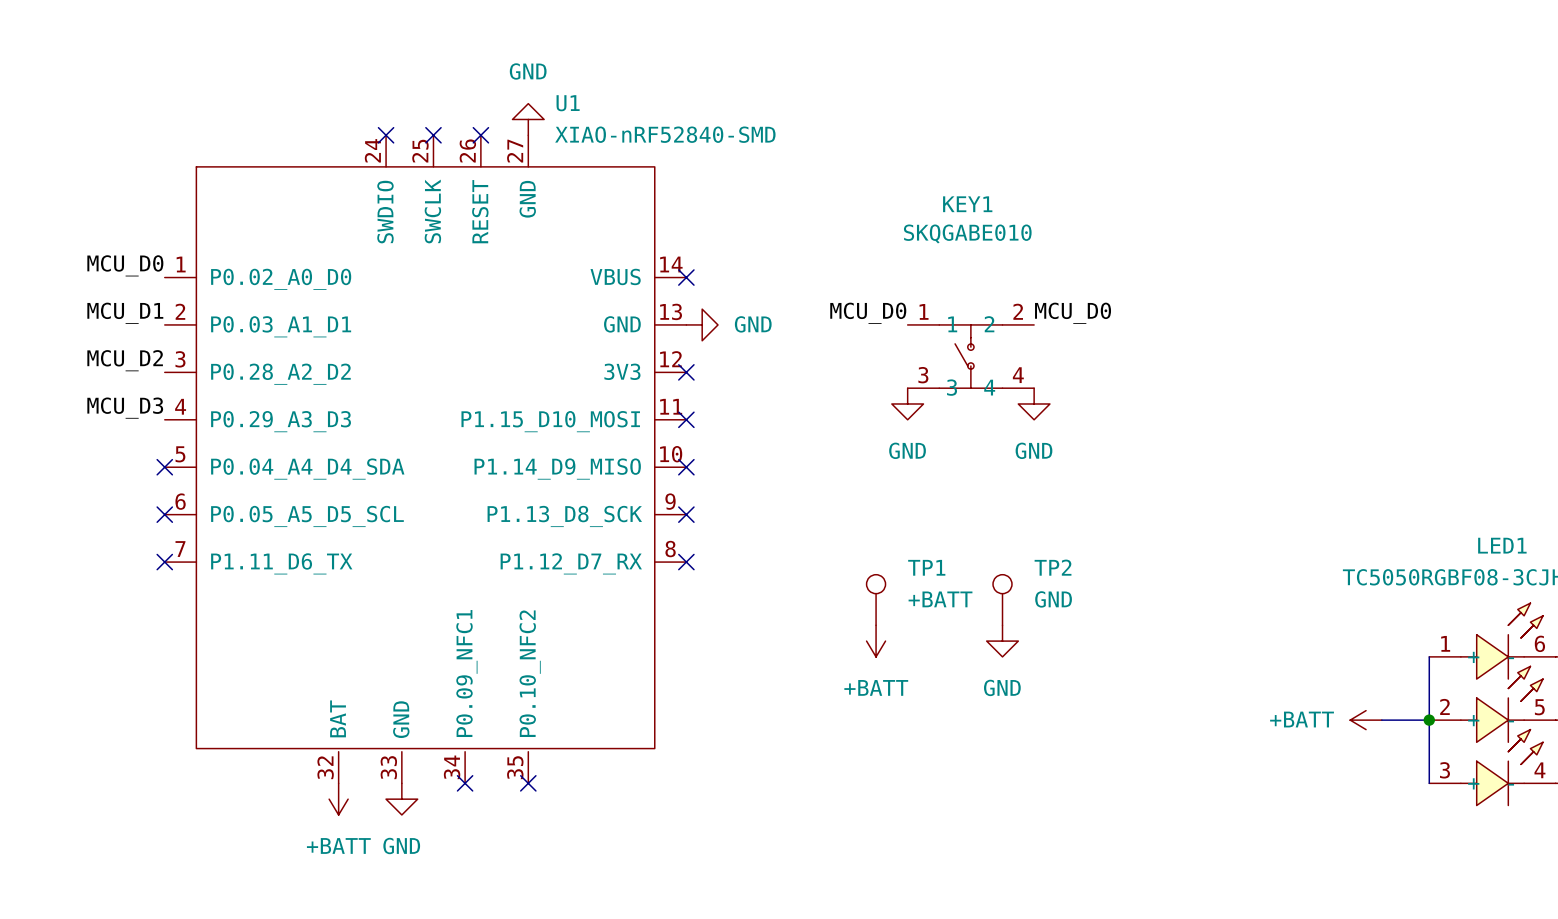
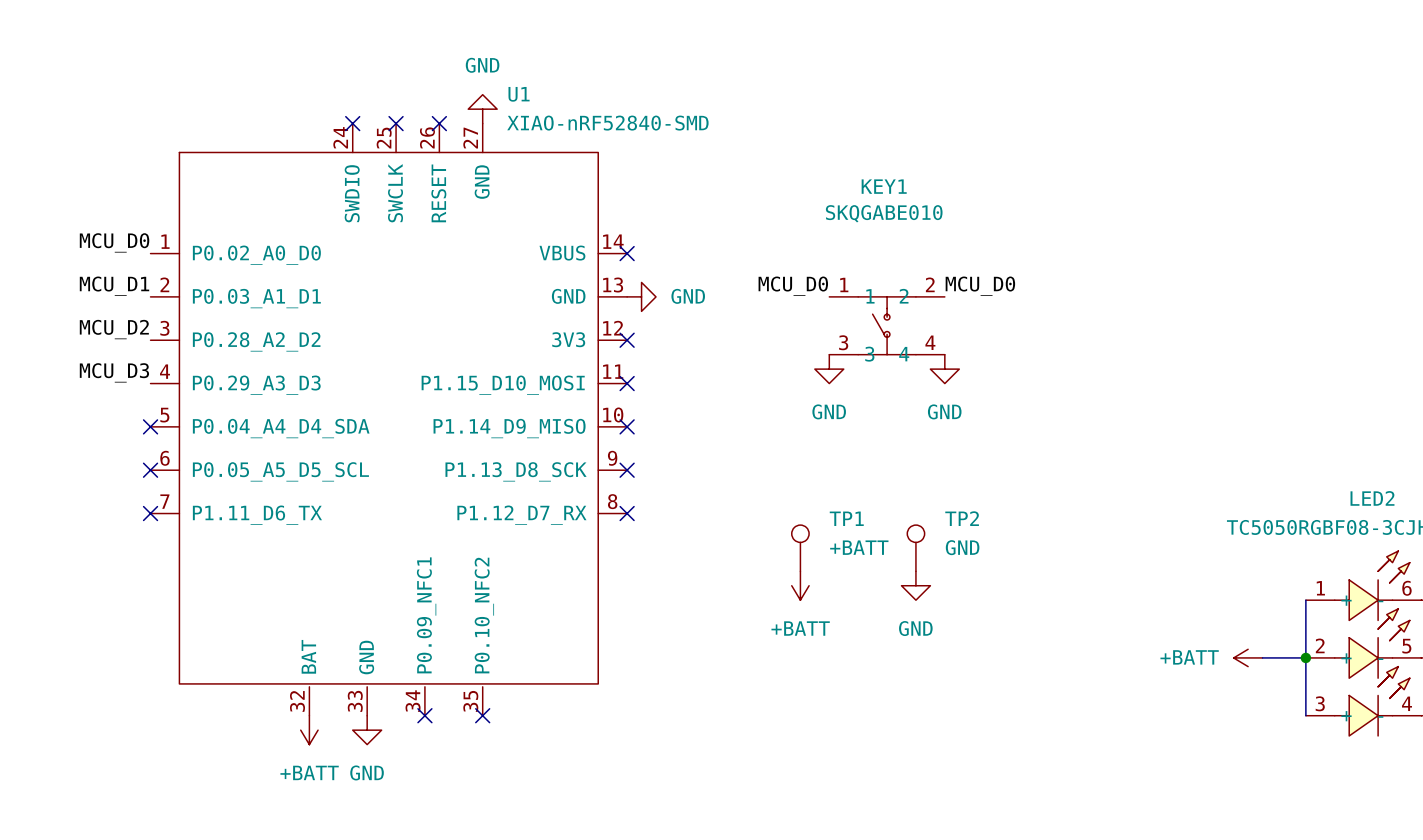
LED1 name: LED1 (1502, 545) -> LED2 (1372, 498)

